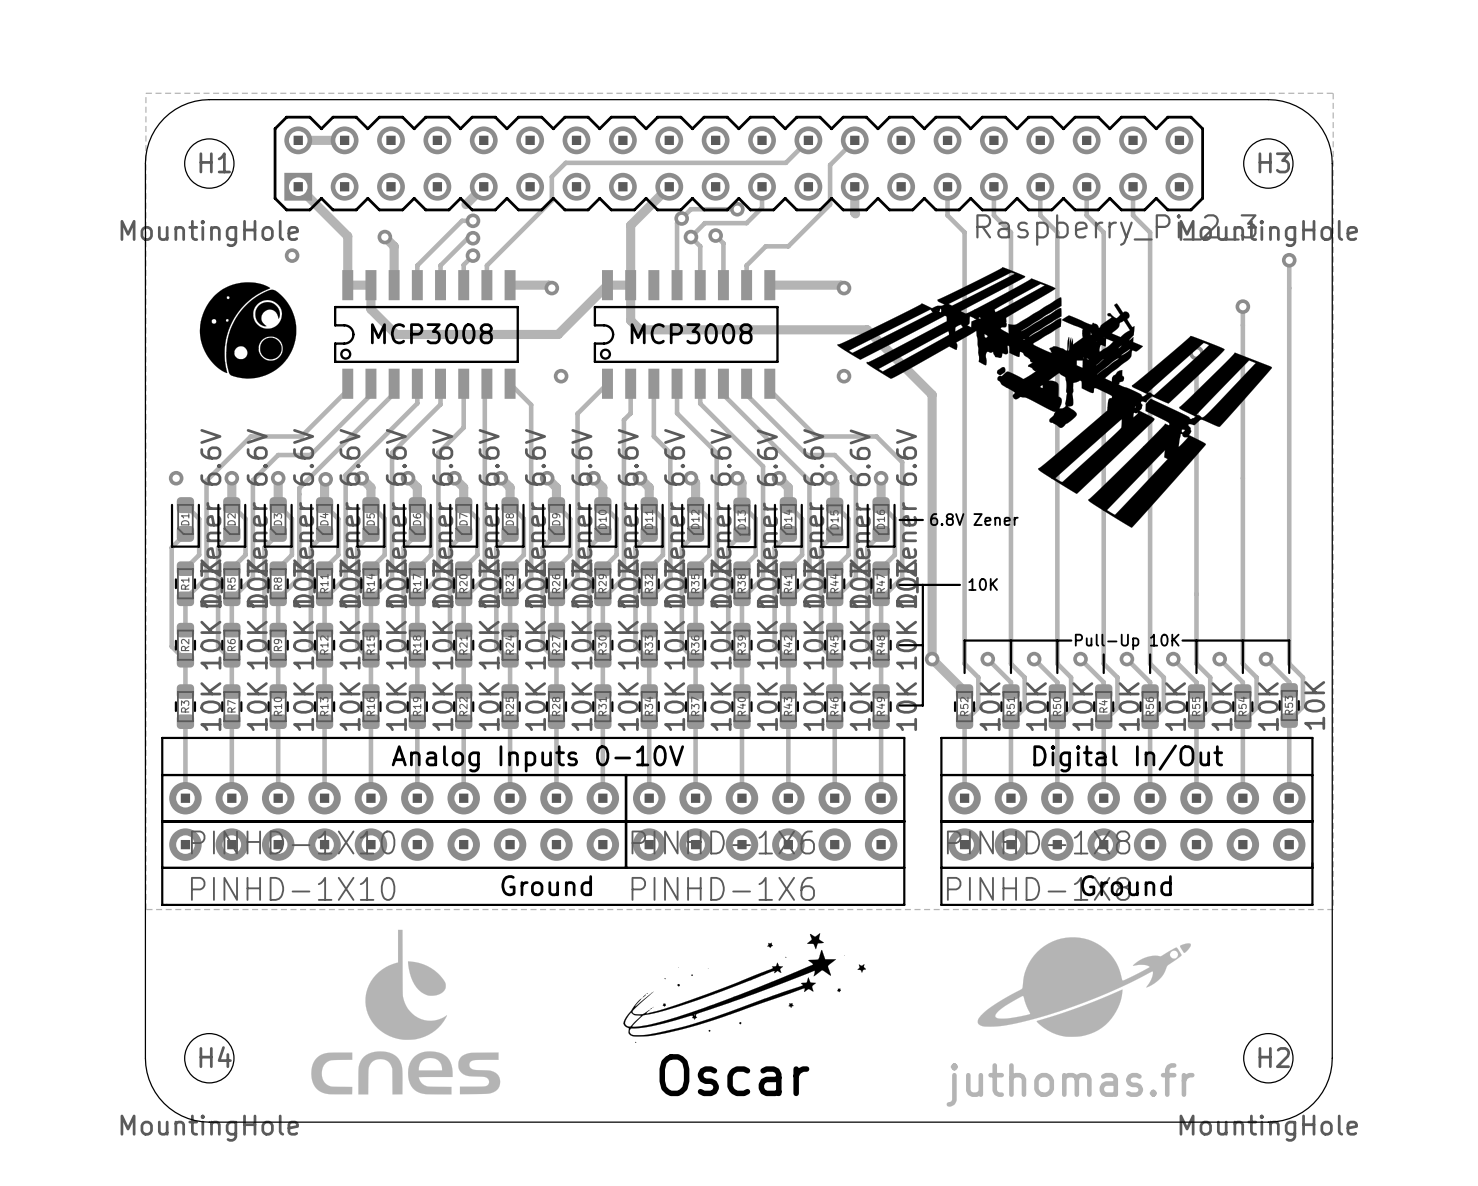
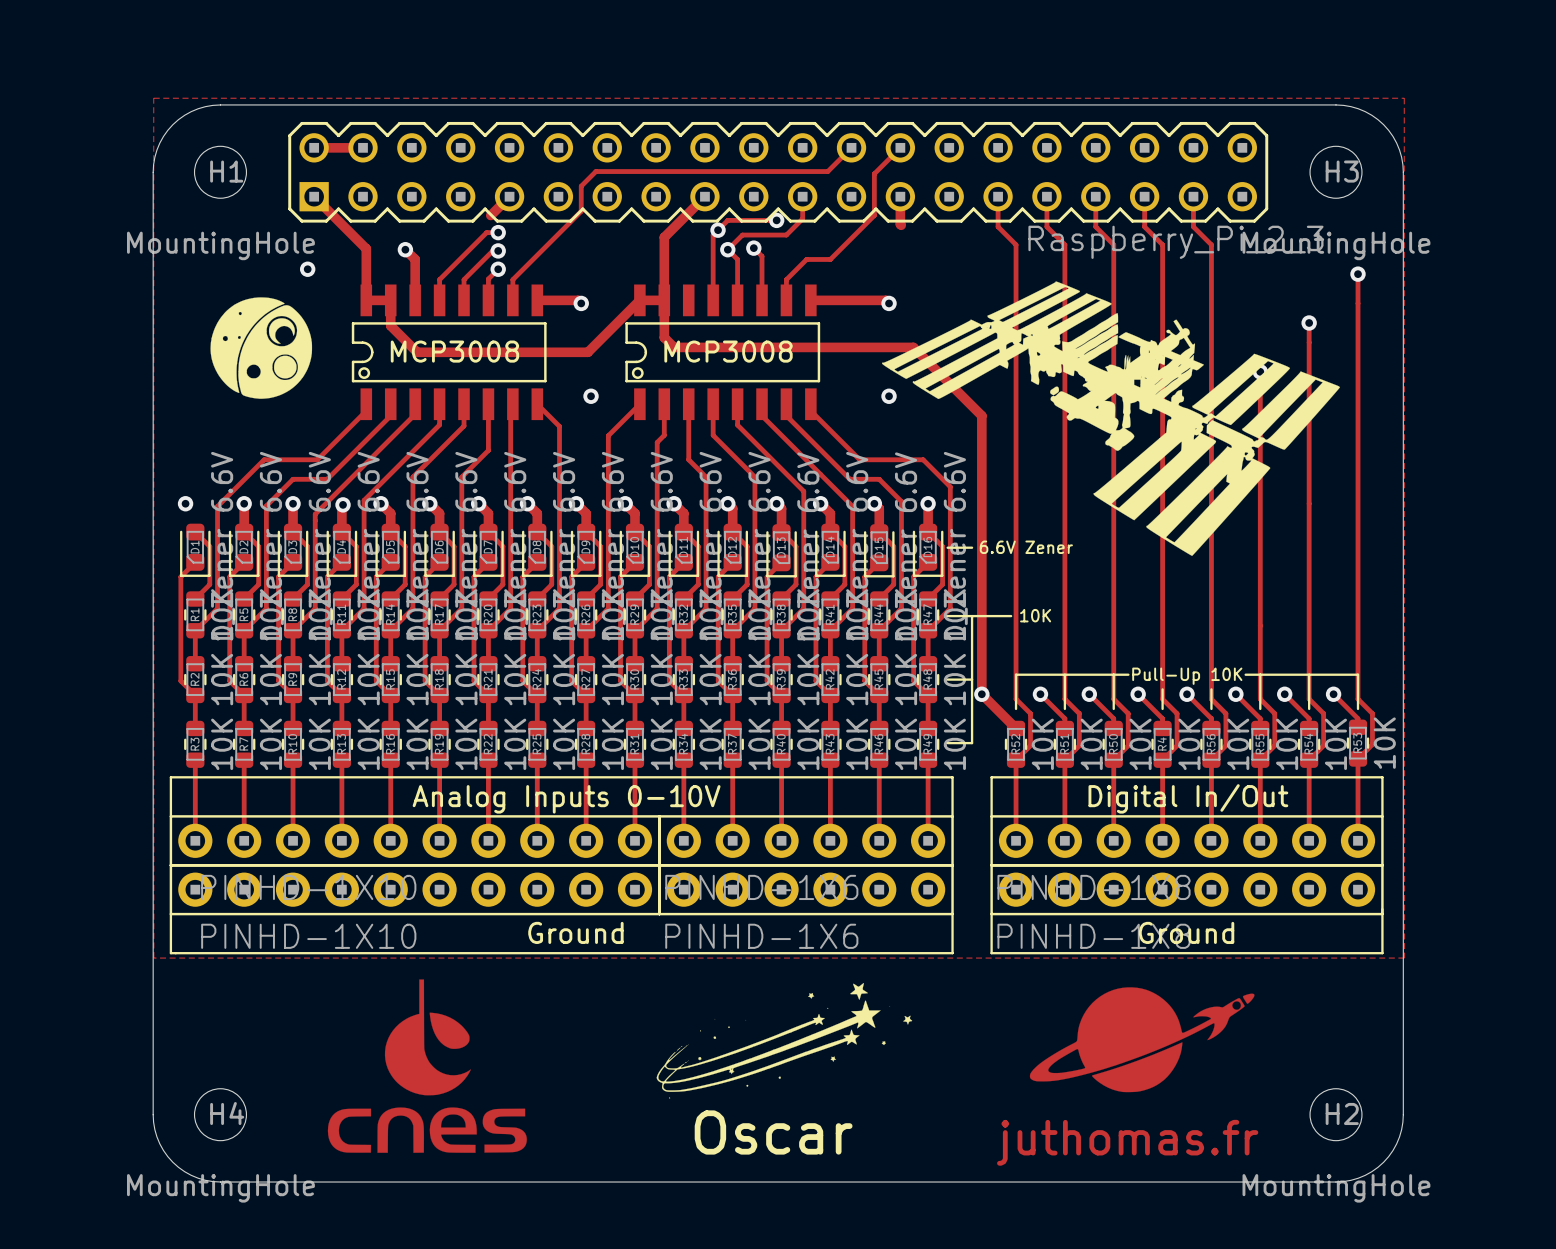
text: 6.8V Zener (974, 519) -> 6.6V Zener (1026, 547)

